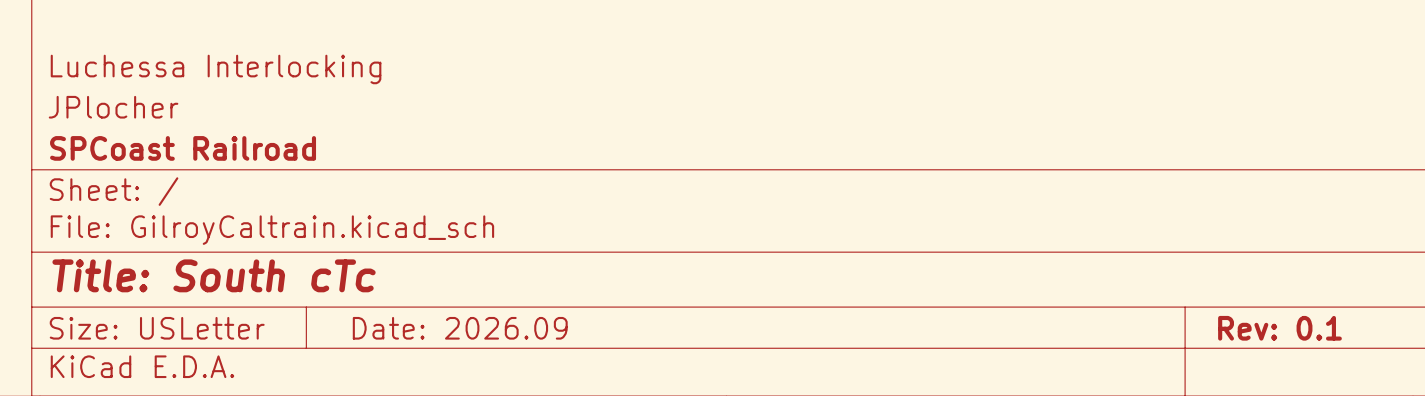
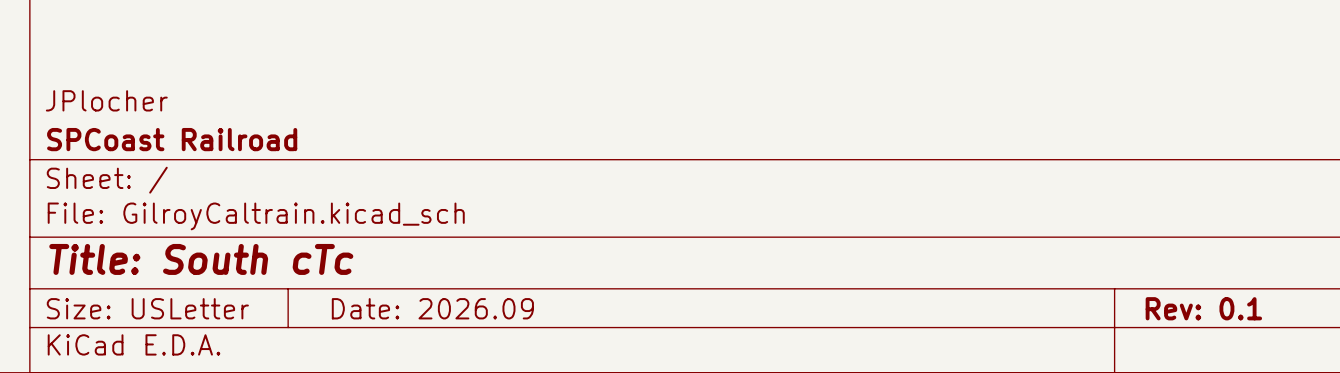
title block: Luchessa Interlocking (216, 69) -> none

